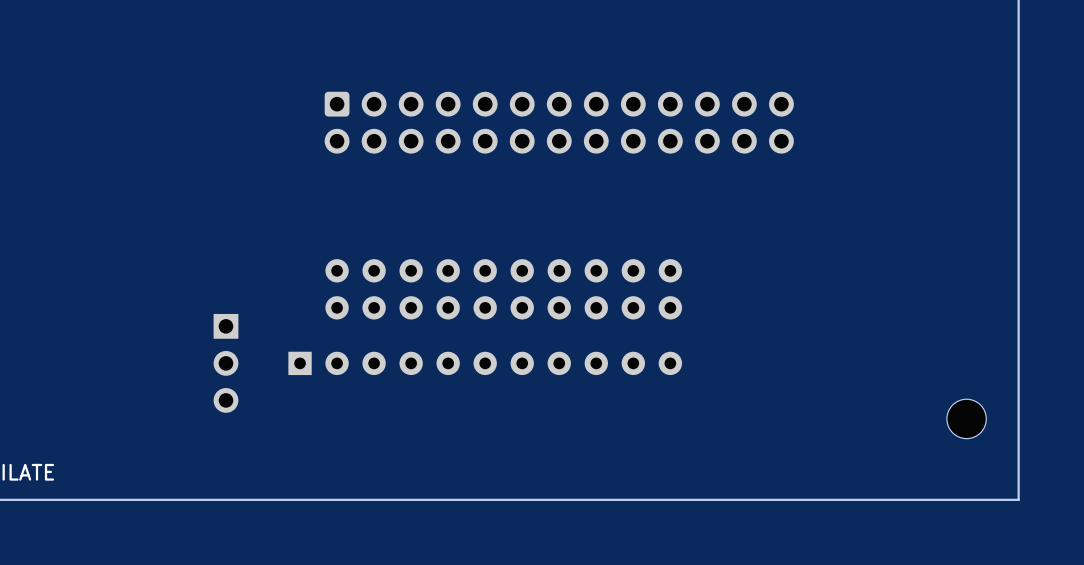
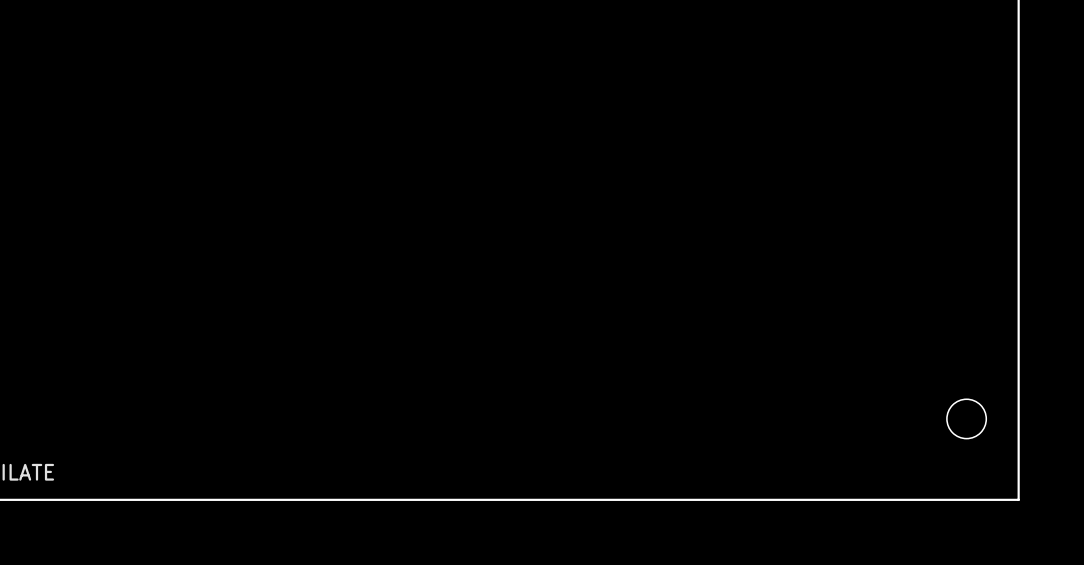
part: (559, 122) -> none
part: (337, 289) -> none
part: (374, 289) -> none
part: (411, 289) -> none
part: (448, 289) -> none
part: (485, 289) -> none
part: (522, 289) -> none
part: (559, 289) -> none
part: (596, 289) -> none
part: (633, 289) -> none
part: (670, 289) -> none
part: (225, 363) -> none
part: (485, 363) -> none

